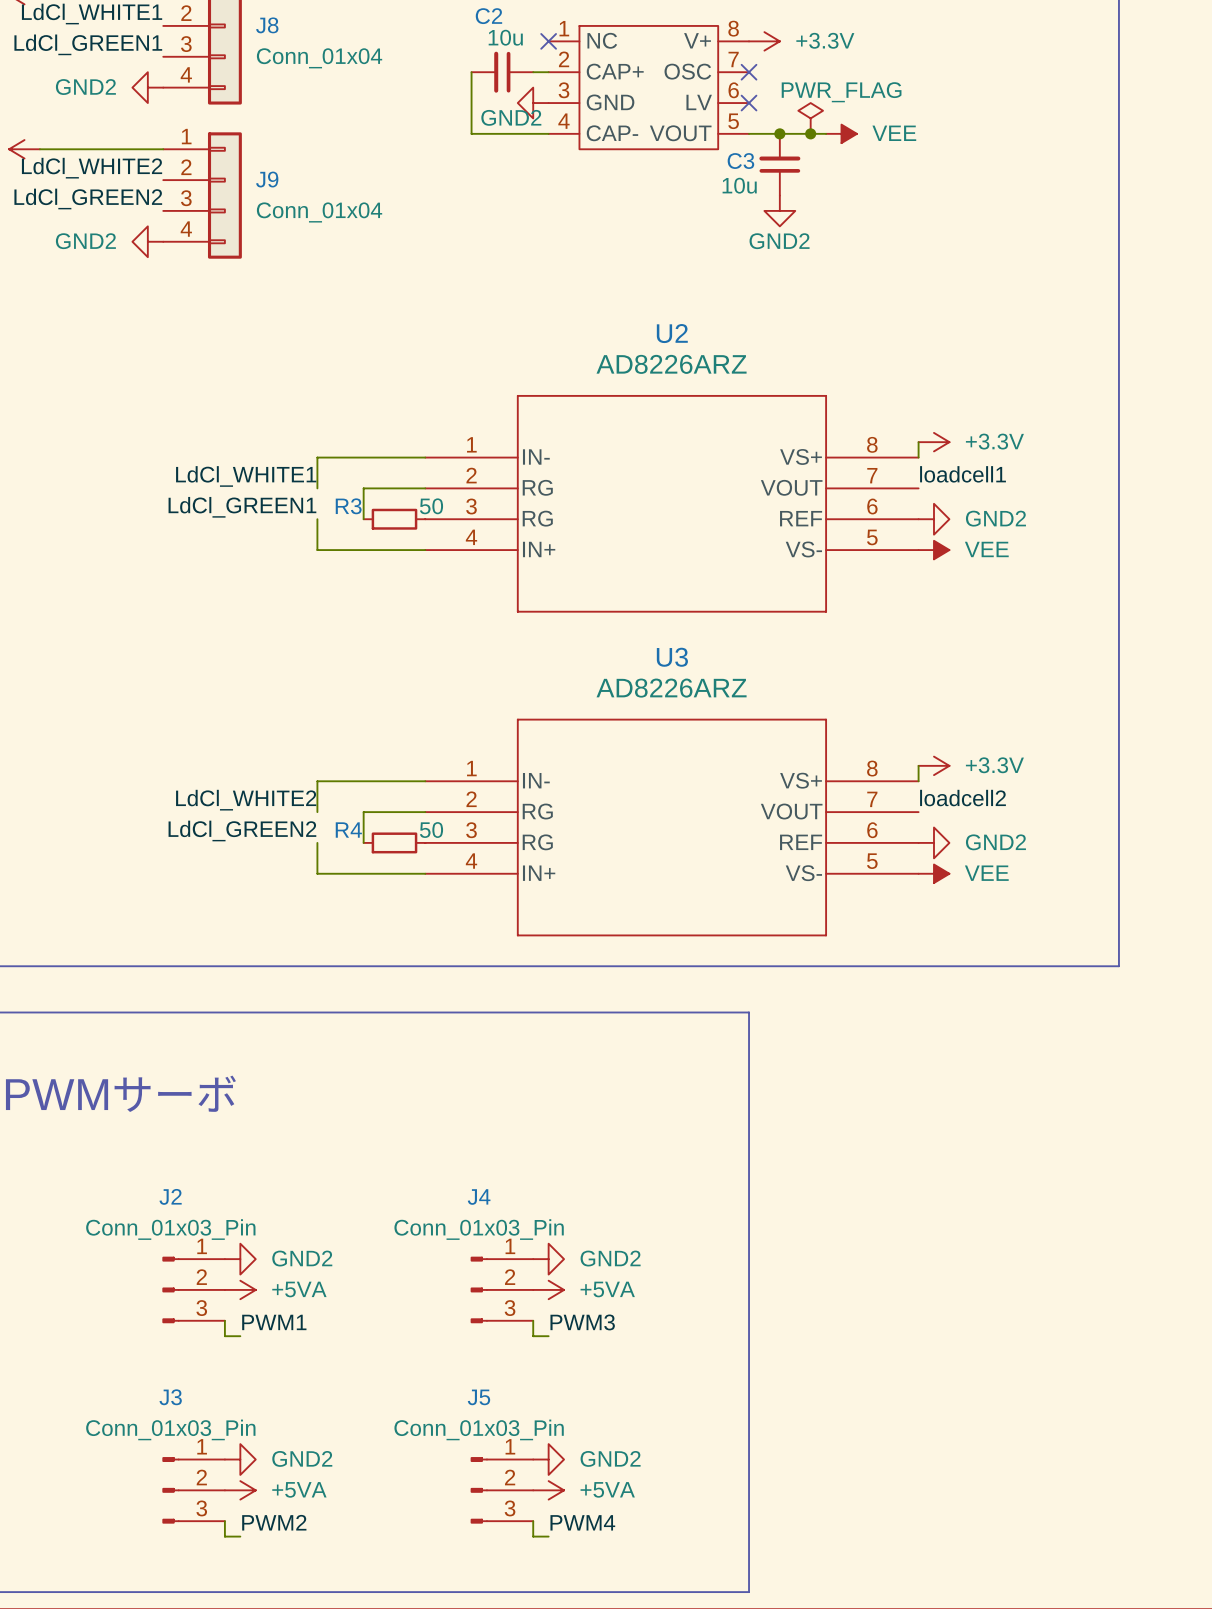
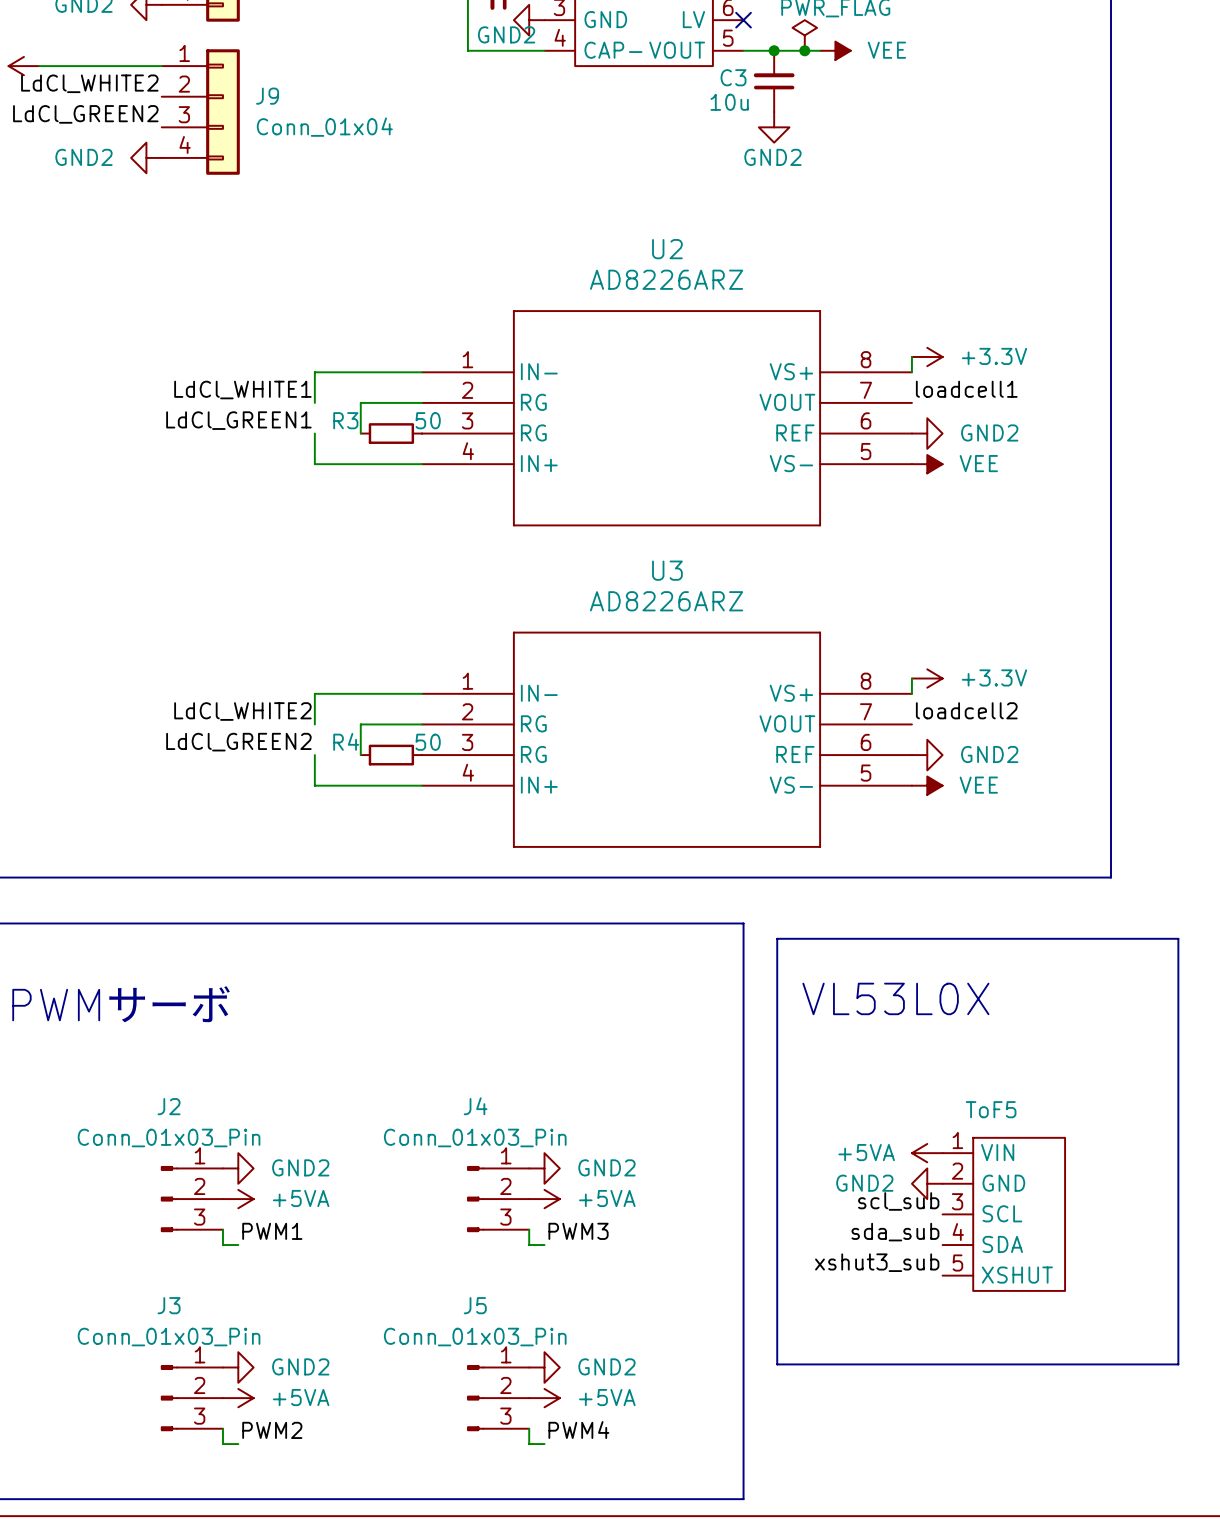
line: none -> (777, 938) (1178, 938) (1178, 1364) (777, 1364) (777, 938)
text: none -> VL53L0X (895, 998)
power symbol: none -> +5VA (927, 1153)
power symbol: none -> GND2 (927, 1183)
label: none -> scl_sub (898, 1201)
ToF5: none -> (1003, 1214)
label: none -> sda_sub (895, 1232)
label: none -> xshut3_sub (877, 1262)

